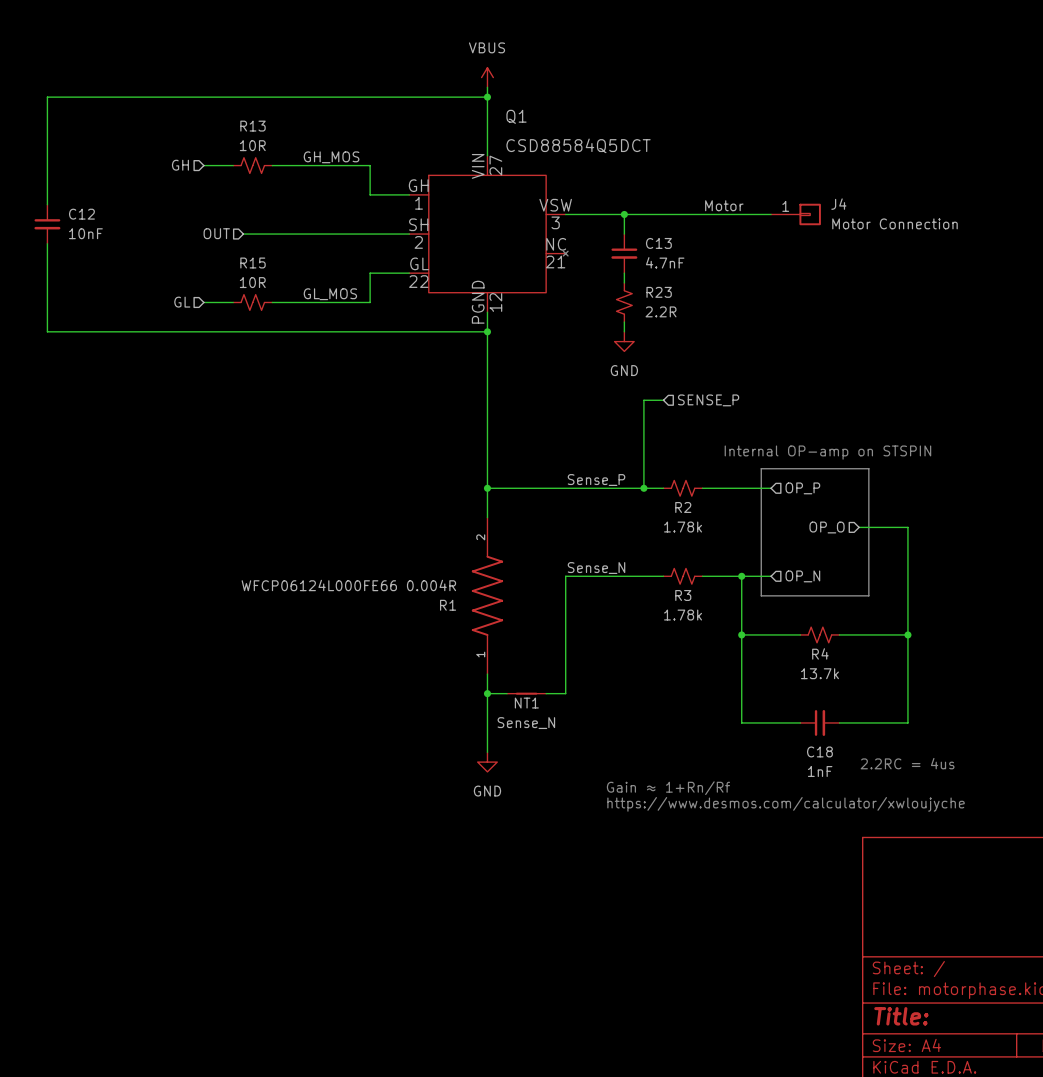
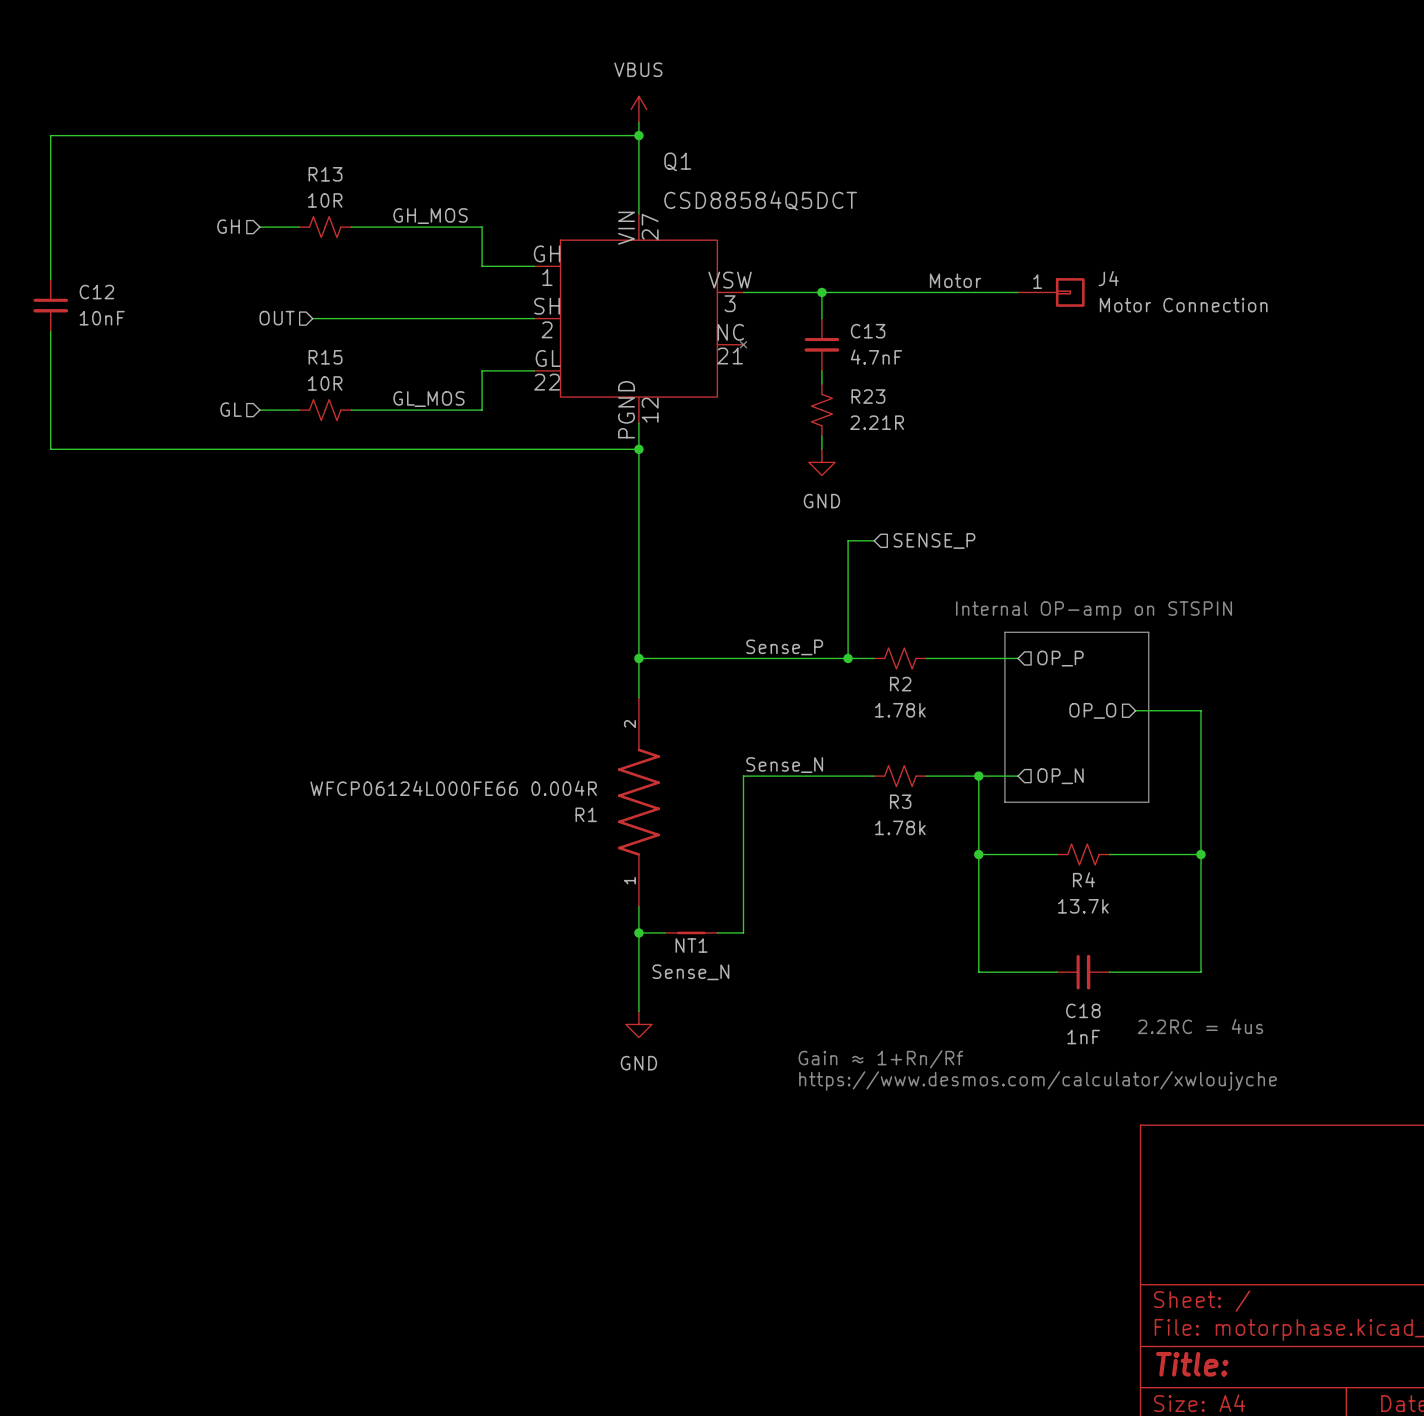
R23 value: 2.2R (661, 311) -> 2.21R (877, 422)

